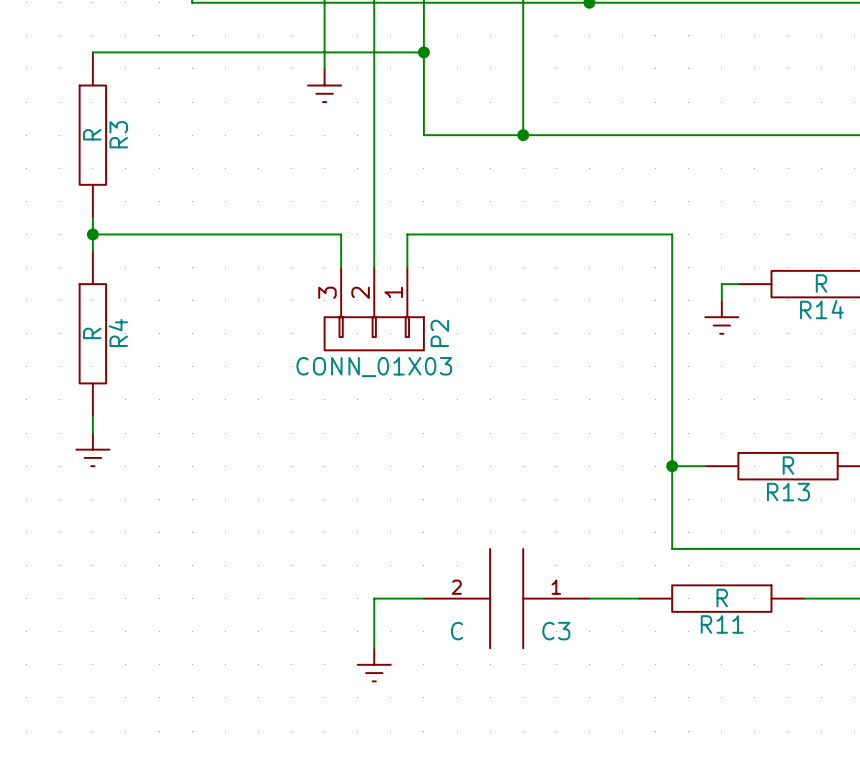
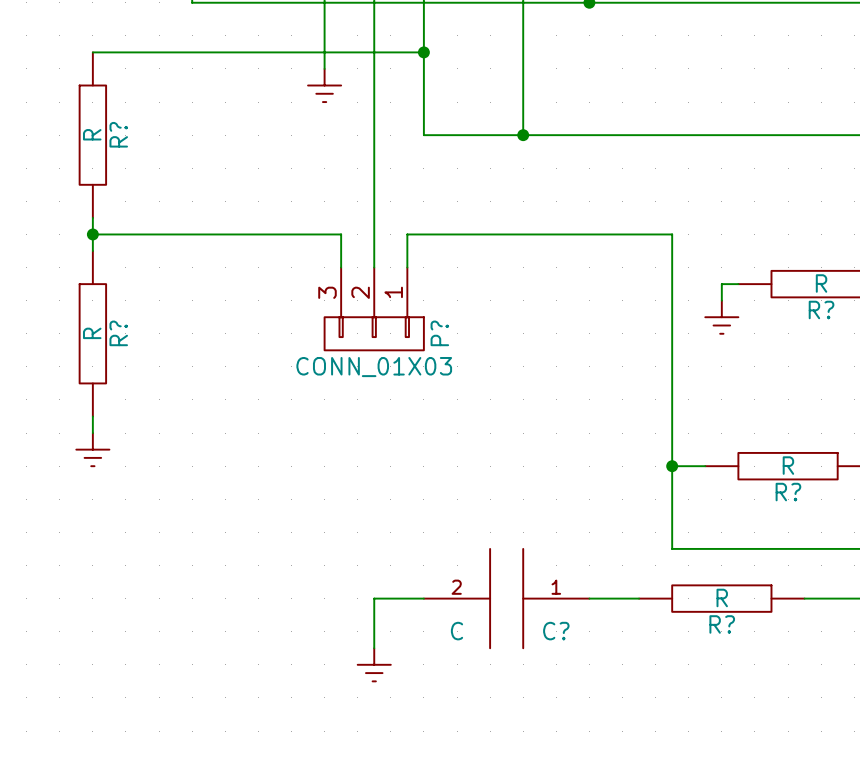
R3 name: R3 (118, 134) -> R? (118, 134)
R14 name: R14 (821, 309) -> R? (821, 309)
R4 name: R4 (118, 332) -> R? (118, 333)
P2 name: P2 (439, 333) -> P? (439, 333)
R13 name: R13 (788, 492) -> R? (788, 492)
R11 name: R11 (722, 624) -> R? (722, 624)
C3 name: C3 (556, 631) -> C? (556, 631)

